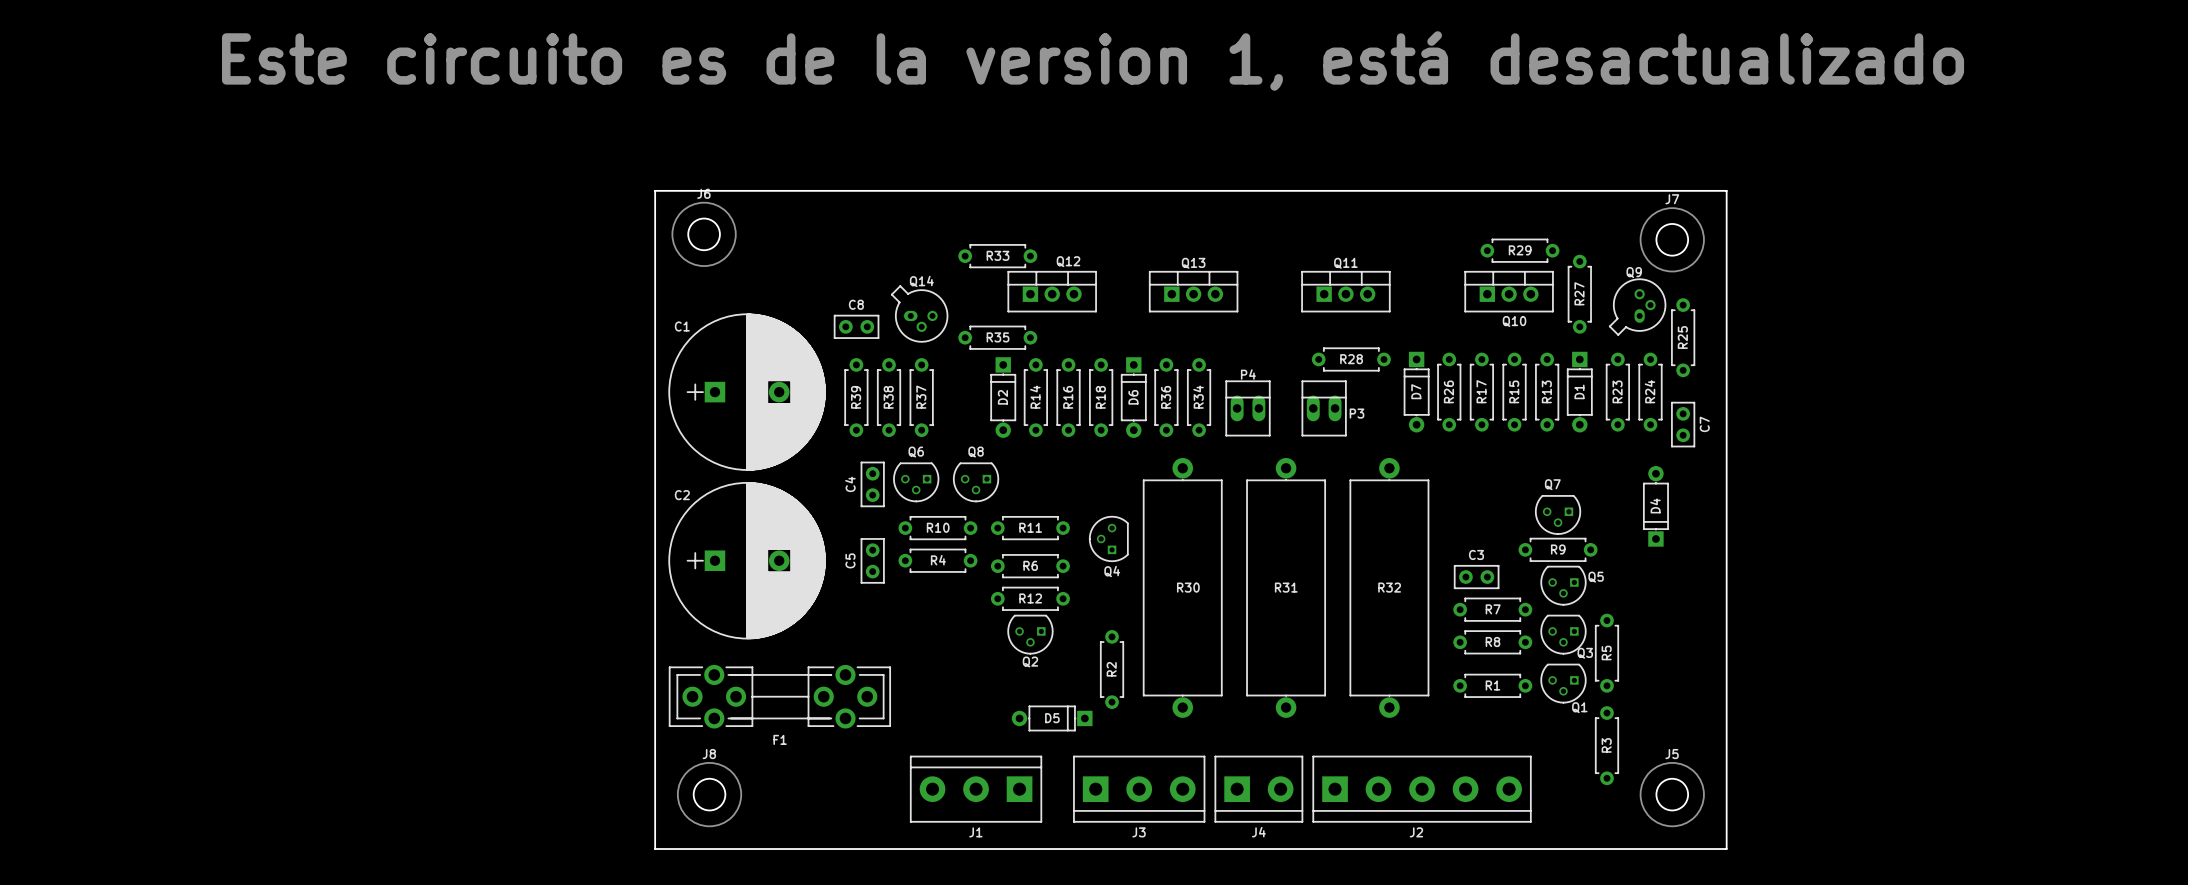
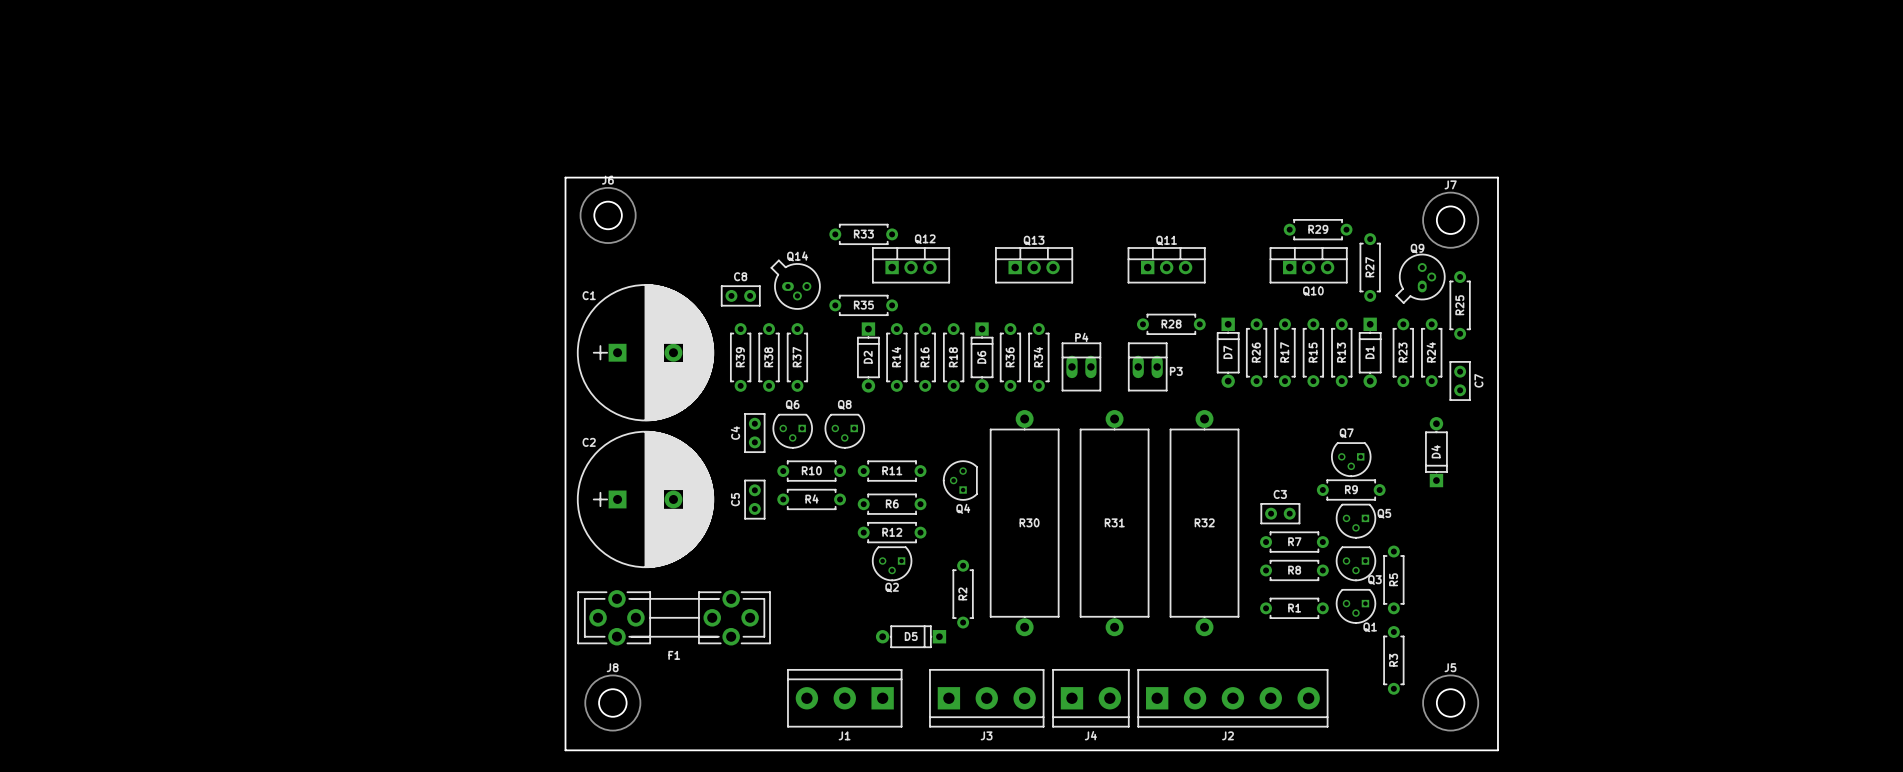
text: Este circuito es de la version 1, está desactualizado (1093, 60) -> none

